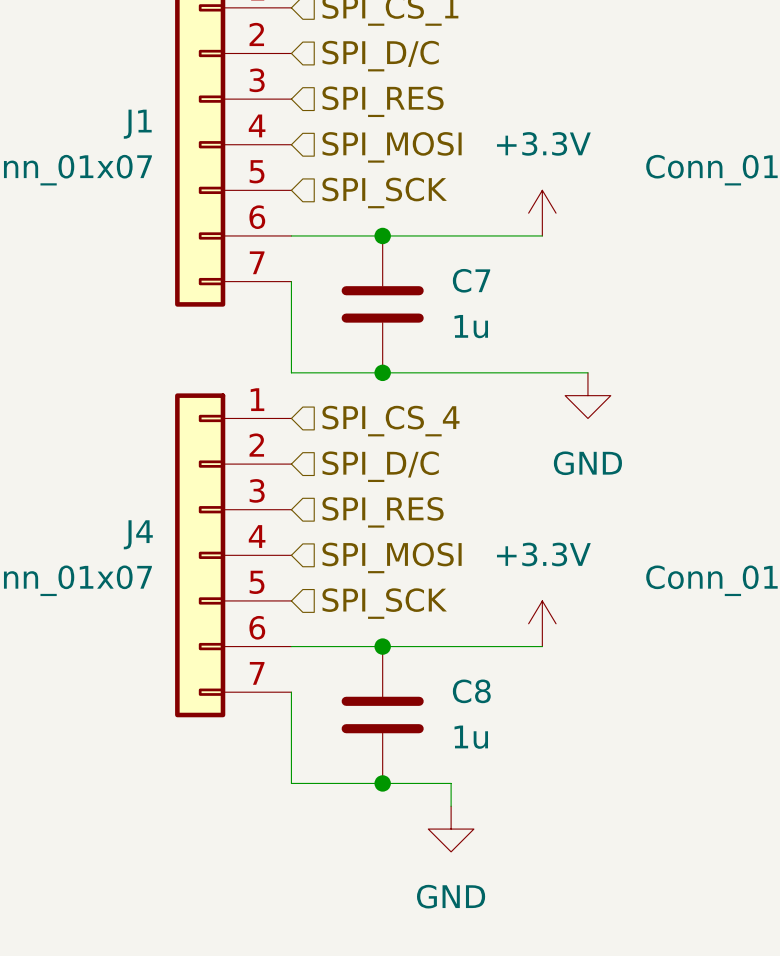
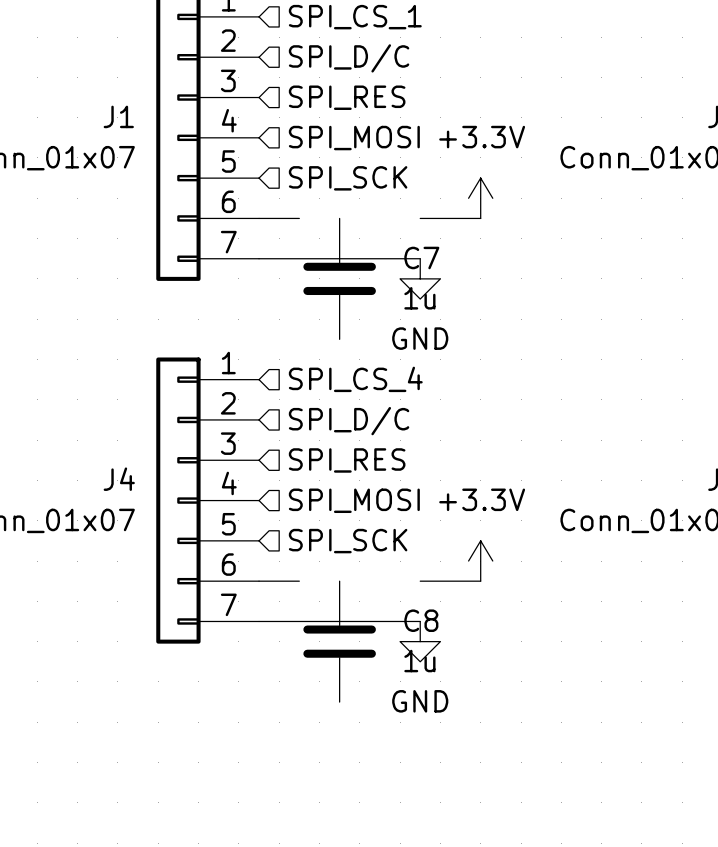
wire: (337, 235) (473, 235) -> none
junction: (382, 235) -> none
wire: (291, 281) (291, 372) (587, 372) -> (259, 258) (420, 258)
junction: (382, 372) -> none
power symbol position: GND (587, 395) -> GND (420, 278)
wire: (337, 646) (473, 646) -> none
junction: (382, 646) -> none
wire: (291, 692) (291, 783) (451, 783) (451, 806) -> (259, 621) (420, 621)
junction: (382, 783) -> none
power symbol position: GND (451, 829) -> GND (420, 641)

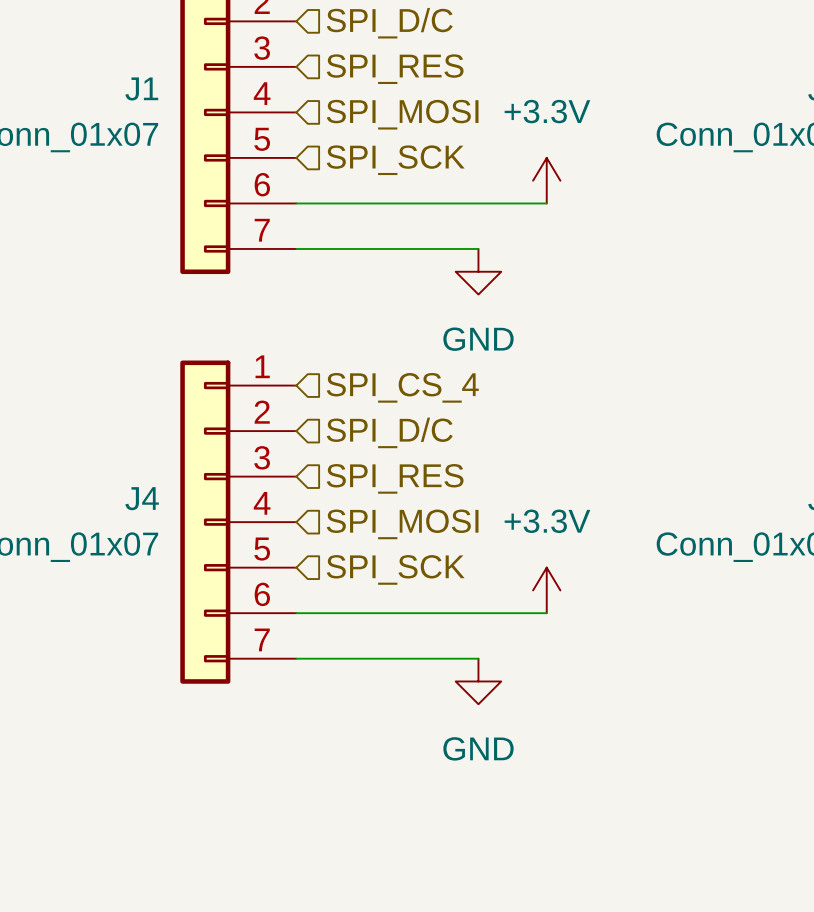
wire: none -> (341, 203) (478, 203)
C7: 1u (339, 278) -> none
wire: none -> (341, 613) (478, 613)
C8: 1u (339, 641) -> none

